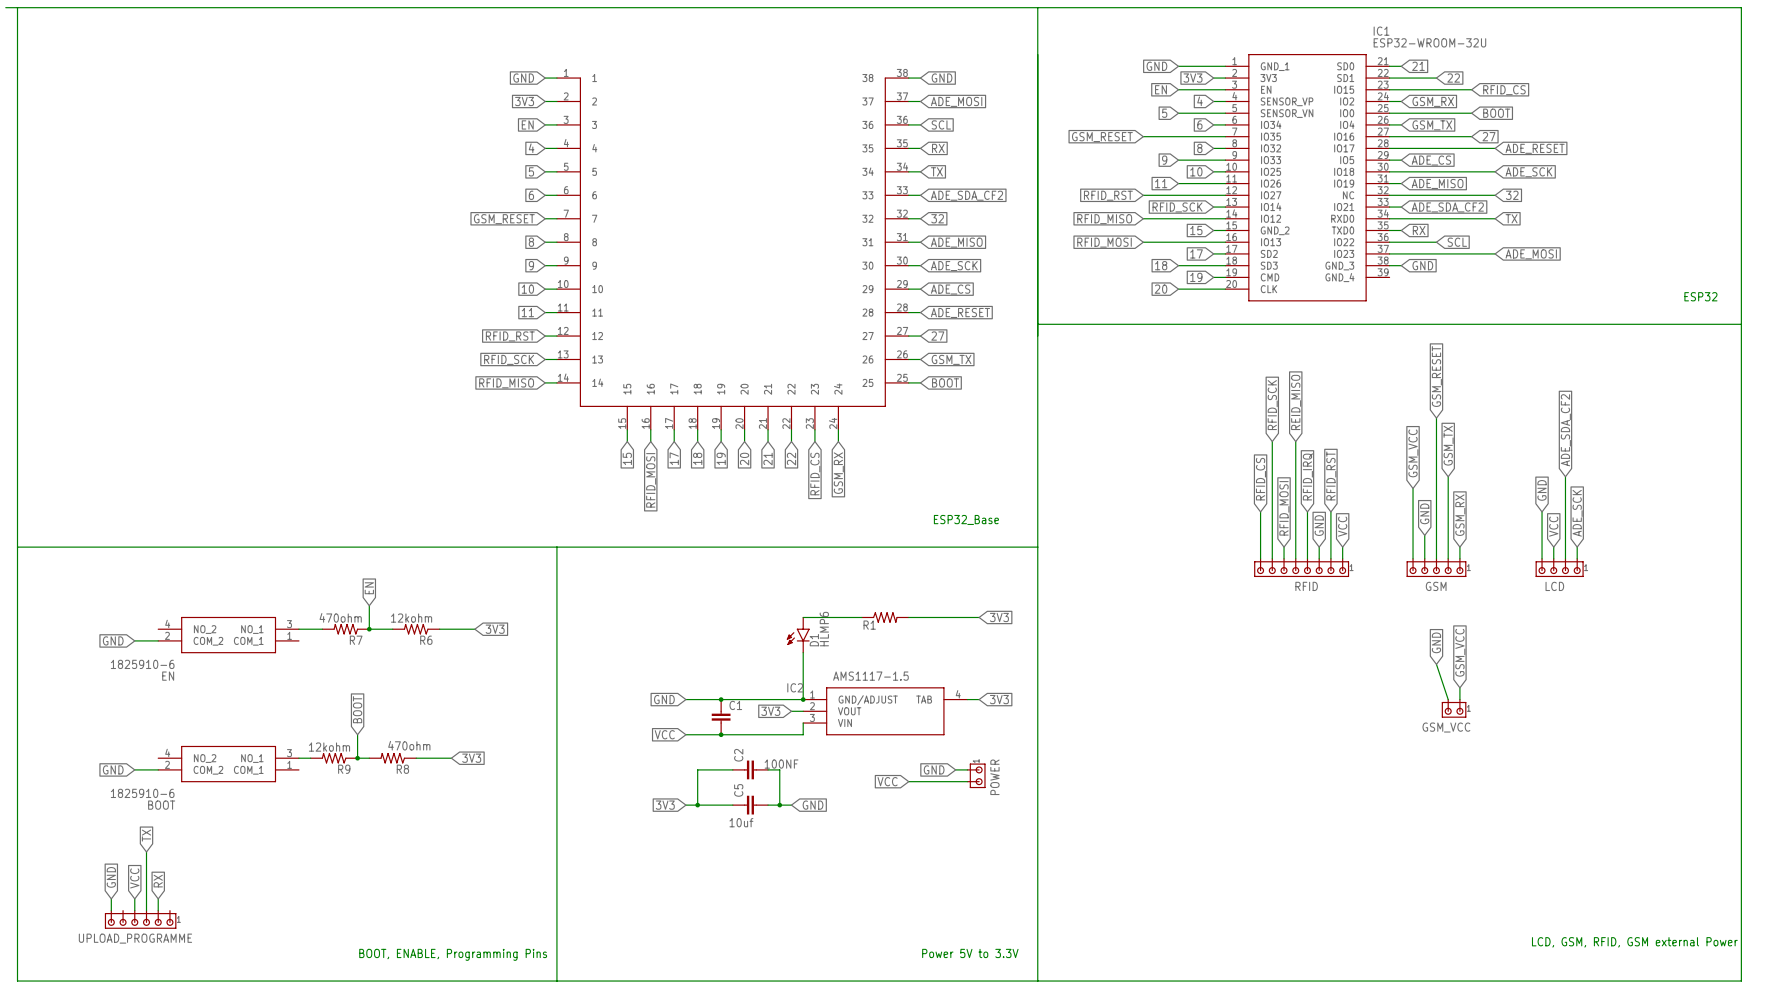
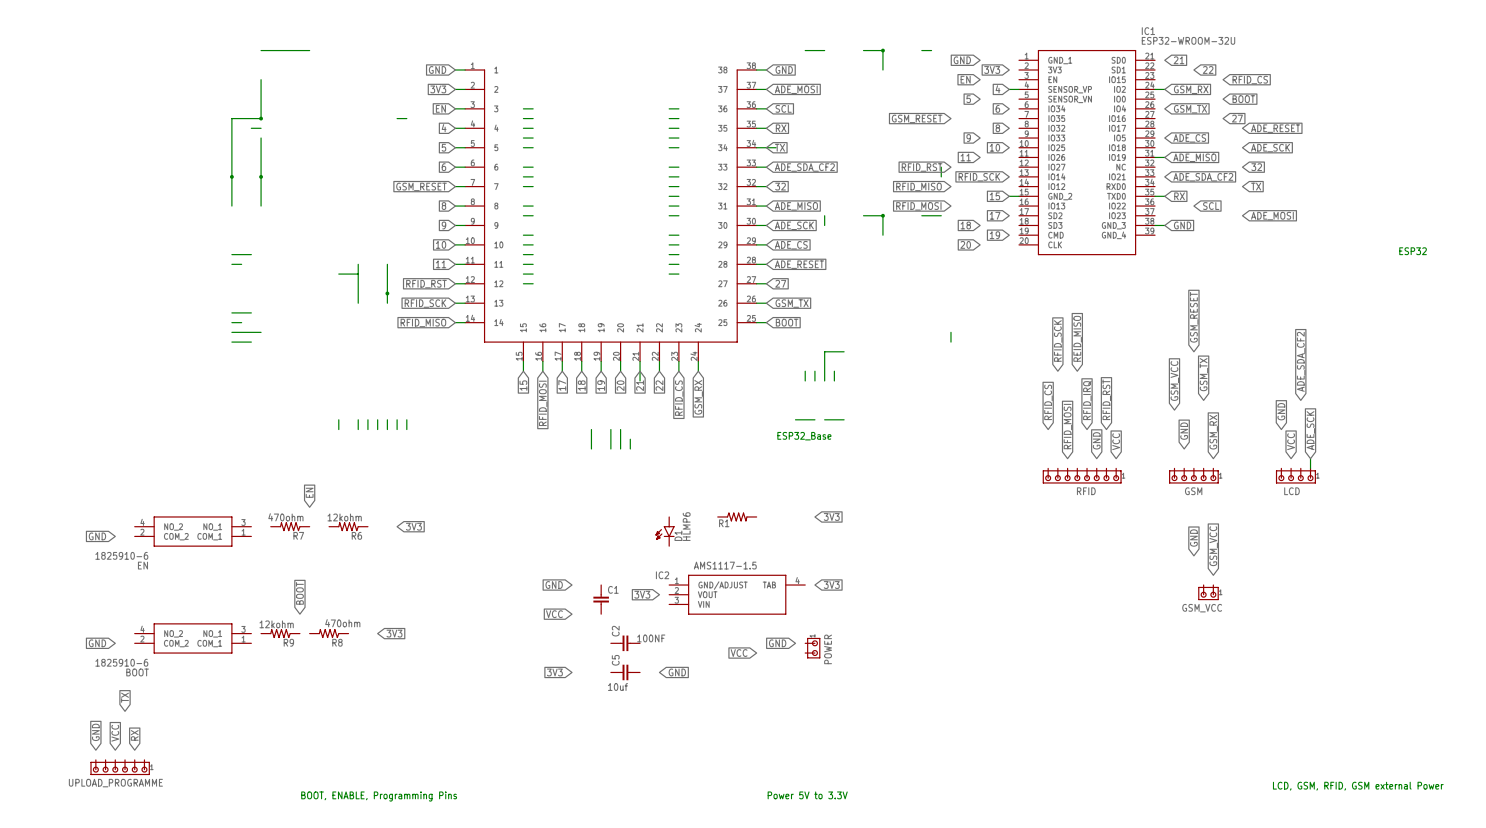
wire: (5, 7) (1741, 7) (1741, 981) (17, 981) (17, 7) -> none
wire: (1037, 7) (1037, 981) -> none
wire: none -> (261, 50) (309, 50)
wire: none -> (805, 50) (824, 50)
wire: none -> (863, 50) (882, 50) (882, 69)
junction: none -> (882, 50)
wire: (1178, 66) (1225, 66) -> none
wire: (1389, 66) (1401, 66) -> none
wire: (1213, 78) (1225, 78) -> (921, 50) (931, 50)
wire: (1389, 78) (1436, 78) -> none
wire: none -> (261, 79) (261, 118) (231, 118) (231, 206)
wire: (1178, 89) (1225, 89) -> none
wire: (1389, 89) (1471, 89) -> none
wire: (1178, 113) (1225, 113) -> none
wire: (1389, 113) (1471, 113) -> none
wire: none -> (523, 108) (533, 108)
wire: none -> (669, 108) (678, 108)
wire: (1213, 124) (1225, 124) -> none
wire: (1389, 124) (1401, 124) -> none
junction: none -> (261, 118)
wire: none -> (397, 118) (406, 118)
wire: none -> (523, 118) (533, 118)
wire: none -> (669, 118) (678, 118)
wire: (1143, 136) (1225, 136) -> none
wire: (1389, 136) (1471, 136) -> none
wire: none -> (251, 128) (261, 128)
wire: none -> (523, 128) (533, 128)
wire: none -> (669, 128) (678, 128)
wire: (1213, 148) (1225, 148) -> none
wire: (1389, 148) (1495, 148) -> none
wire: none -> (261, 138) (261, 206)
wire: none -> (523, 138) (533, 138)
wire: none -> (669, 138) (678, 138)
wire: (1178, 160) (1225, 160) -> none
wire: (1389, 160) (1401, 160) -> none
wire: none -> (523, 147) (533, 147)
wire: none -> (669, 147) (678, 147)
wire: none -> (766, 147) (776, 147)
wire: (1213, 171) (1225, 171) -> none
wire: (1389, 171) (1495, 171) -> none
wire: (1178, 183) (1225, 183) -> none
wire: none -> (523, 167) (533, 167)
wire: none -> (669, 167) (678, 167)
wire: none -> (941, 167) (941, 176)
wire: (1143, 195) (1225, 195) -> none
wire: (1389, 195) (1495, 195) -> none
junction: none -> (231, 176)
junction: none -> (261, 176)
wire: none -> (523, 176) (533, 176)
wire: none -> (669, 176) (678, 176)
wire: (1213, 207) (1225, 207) -> none
wire: (1389, 207) (1401, 207) -> none
wire: none -> (523, 186) (533, 186)
wire: none -> (669, 186) (678, 186)
wire: (1143, 218) (1225, 218) -> none
wire: (1389, 218) (1495, 218) -> none
wire: none -> (669, 196) (678, 196)
wire: none -> (523, 206) (533, 206)
wire: none -> (669, 206) (678, 206)
wire: (1143, 242) (1225, 242) -> none
wire: (1389, 242) (1436, 242) -> none
wire: none -> (523, 215) (533, 215)
wire: none -> (669, 215) (678, 215)
wire: none -> (824, 215) (824, 225)
wire: none -> (863, 215) (882, 215) (882, 235)
junction: none -> (882, 215)
wire: none -> (921, 215) (941, 215)
wire: (1213, 253) (1225, 253) -> none
wire: (1389, 253) (1495, 253) -> none
wire: (1178, 265) (1225, 265) -> none
wire: none -> (523, 235) (533, 235)
wire: none -> (669, 235) (678, 235)
wire: (1213, 277) (1225, 277) -> none
wire: none -> (523, 244) (533, 244)
wire: none -> (669, 244) (678, 244)
wire: (1178, 289) (1225, 289) -> none
wire: none -> (231, 254) (251, 254)
wire: none -> (523, 254) (533, 254)
wire: none -> (669, 254) (678, 254)
wire: none -> (231, 264) (241, 264)
wire: none -> (358, 264) (358, 303)
wire: none -> (387, 264) (387, 303)
wire: none -> (523, 264) (533, 264)
wire: none -> (669, 264) (678, 264)
wire: none -> (338, 274) (358, 274)
wire: none -> (523, 274) (533, 274)
wire: none -> (669, 274) (678, 274)
wire: (1037, 324) (1741, 324) -> none
wire: none -> (523, 283) (533, 283)
junction: none -> (387, 293)
wire: none -> (231, 312) (251, 312)
wire: none -> (231, 322) (241, 322)
wire: none -> (231, 332) (261, 332)
wire: none -> (950, 332) (950, 342)
wire: none -> (231, 342) (251, 342)
wire: none -> (844, 351) (824, 351) (824, 380)
wire: (1436, 418) (1436, 558) -> none
wire: none -> (640, 371) (640, 380)
wire: none -> (805, 371) (805, 380)
wire: none -> (814, 371) (814, 380)
wire: none -> (834, 371) (834, 380)
wire: (1272, 441) (1272, 558) -> none
wire: (1295, 441) (1295, 558) -> none
wire: (1448, 476) (1448, 558) -> none
wire: (1565, 476) (1565, 558) -> none
wire: (1413, 488) (1413, 558) -> none
wire: none -> (338, 419) (338, 429)
wire: none -> (358, 419) (358, 429)
wire: none -> (367, 419) (367, 429)
wire: none -> (377, 419) (377, 429)
wire: none -> (387, 419) (387, 429)
wire: none -> (397, 419) (397, 429)
wire: none -> (406, 419) (406, 429)
wire: none -> (795, 419) (814, 419)
wire: none -> (824, 419) (844, 419)
wire: none -> (591, 429) (591, 448)
wire: none -> (610, 429) (610, 448)
wire: none -> (620, 429) (620, 448)
wire: (1260, 511) (1260, 558) -> none
wire: (1307, 511) (1307, 558) -> none
wire: (1330, 511) (1330, 558) -> none
wire: (1542, 511) (1542, 558) -> none
wire: none -> (630, 439) (630, 448)
wire: (1424, 535) (1424, 558) -> none
wire: (17, 547) (1037, 547) -> none
wire: (556, 547) (556, 981) -> none
wire: (1284, 547) (1284, 558) -> none
wire: (1319, 547) (1319, 558) -> none
wire: (1342, 547) (1342, 558) -> none
wire: (1459, 547) (1459, 558) -> none
wire: (1553, 547) (1553, 558) -> none
wire: (369, 605) (369, 629) (392, 629) -> none
wire: (803, 617) (861, 617) -> none
wire: (908, 617) (979, 617) -> none
wire: (298, 629) (322, 629) -> none
junction: (369, 629) -> none
wire: (439, 629) (474, 629) -> none
wire: (134, 640) (158, 640) -> none
wire: (803, 652) (803, 699) (685, 699) -> none
wire: (1436, 664) (1448, 699) -> none
wire: (1459, 687) (1459, 699) -> none
junction: (721, 699) -> none
junction: (803, 699) -> none
wire: (967, 699) (979, 699) -> none
wire: (791, 711) (803, 711) -> none
wire: (803, 723) (803, 734) (685, 734) -> none
wire: (357, 734) (357, 758) (369, 758) -> none
junction: (721, 734) -> none
wire: (298, 758) (310, 758) -> none
junction: (357, 758) -> none
wire: (416, 758) (451, 758) -> none
wire: (134, 769) (158, 769) -> none
wire: (732, 769) (697, 769) (697, 805) -> none
wire: (768, 769) (779, 769) (779, 805) -> none
wire: (955, 769) (967, 769) -> none
wire: (908, 781) (967, 781) -> none
wire: (685, 805) (732, 805) -> none
junction: (697, 805) -> none
wire: (768, 805) (791, 805) -> none
junction: (779, 805) -> none
wire: (146, 852) (146, 910) -> none
wire: (111, 898) (111, 910) -> none
wire: (134, 898) (134, 910) -> none
wire: (158, 898) (158, 910) -> none

